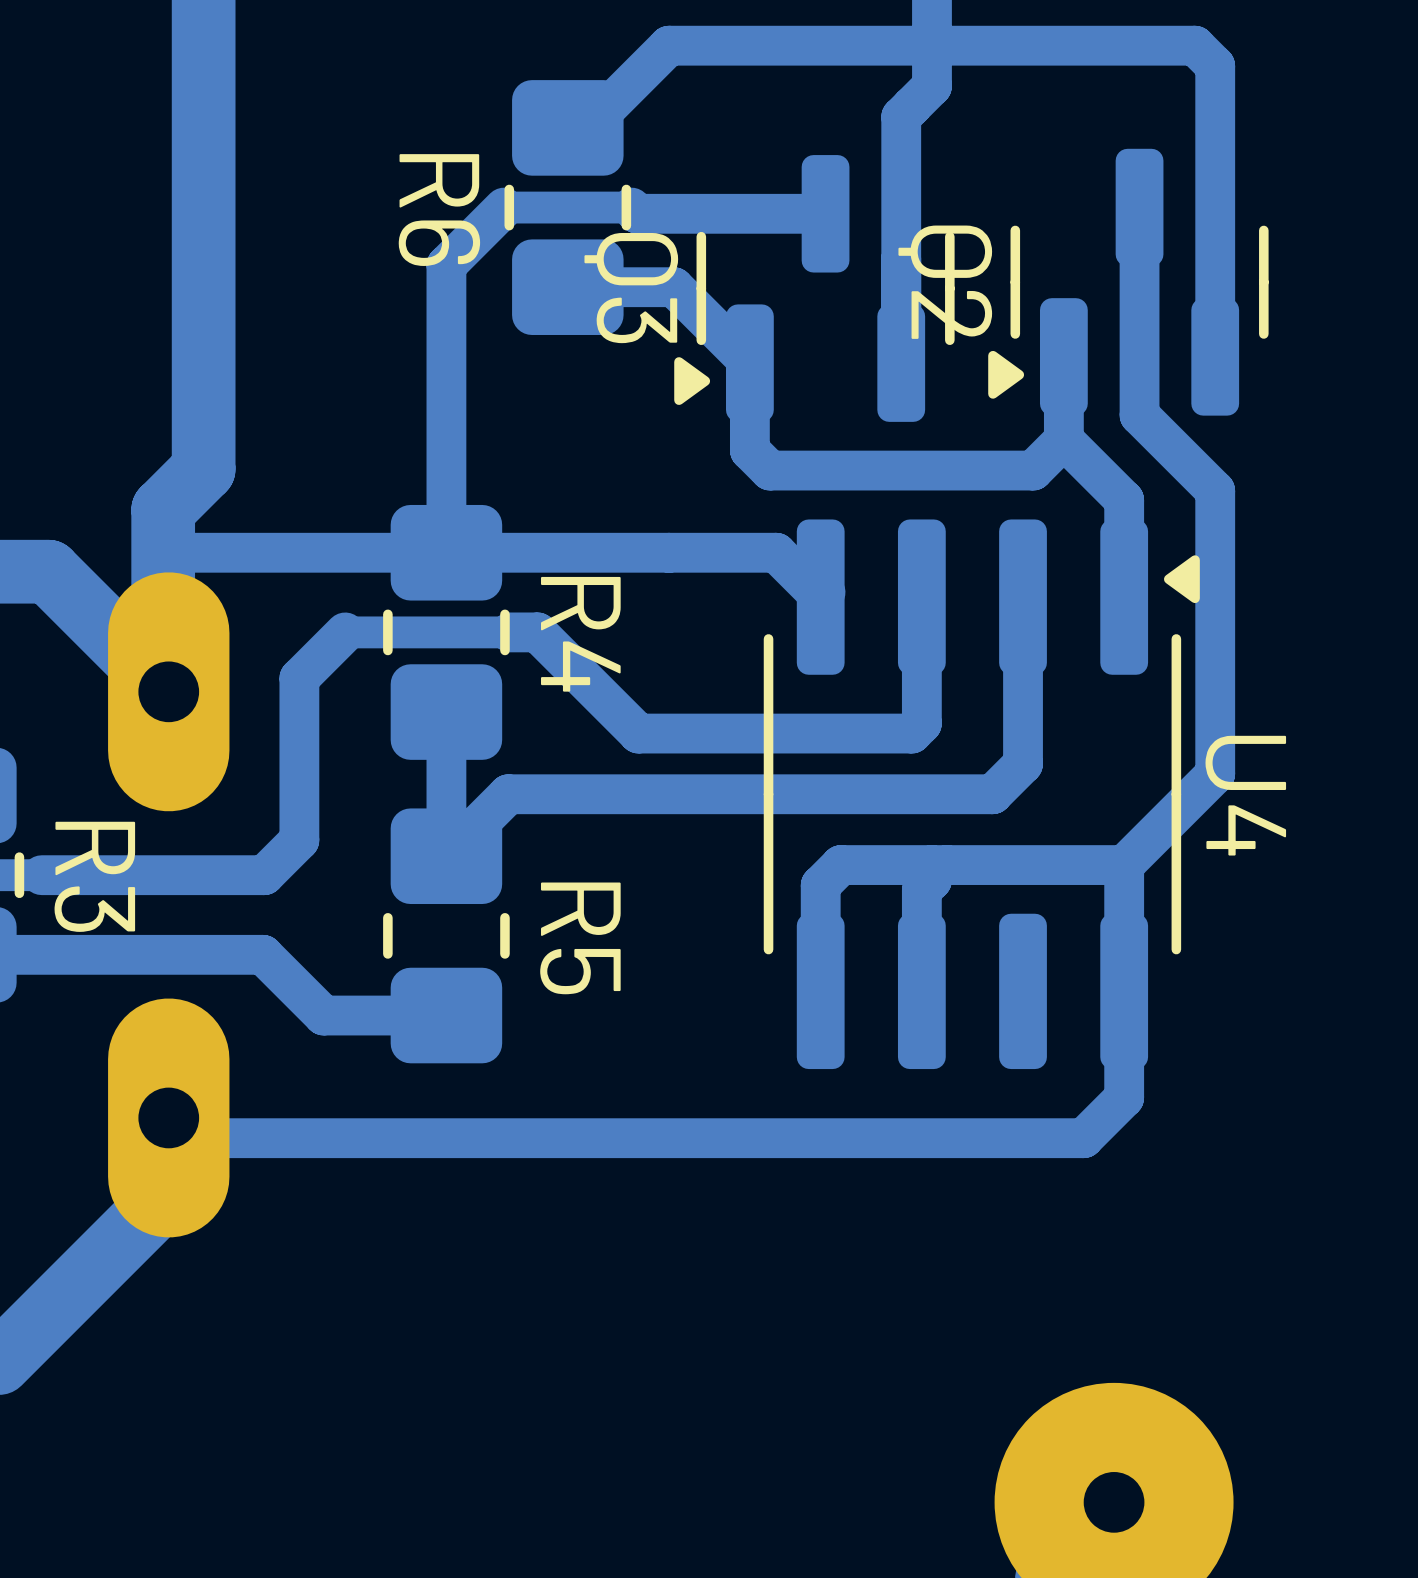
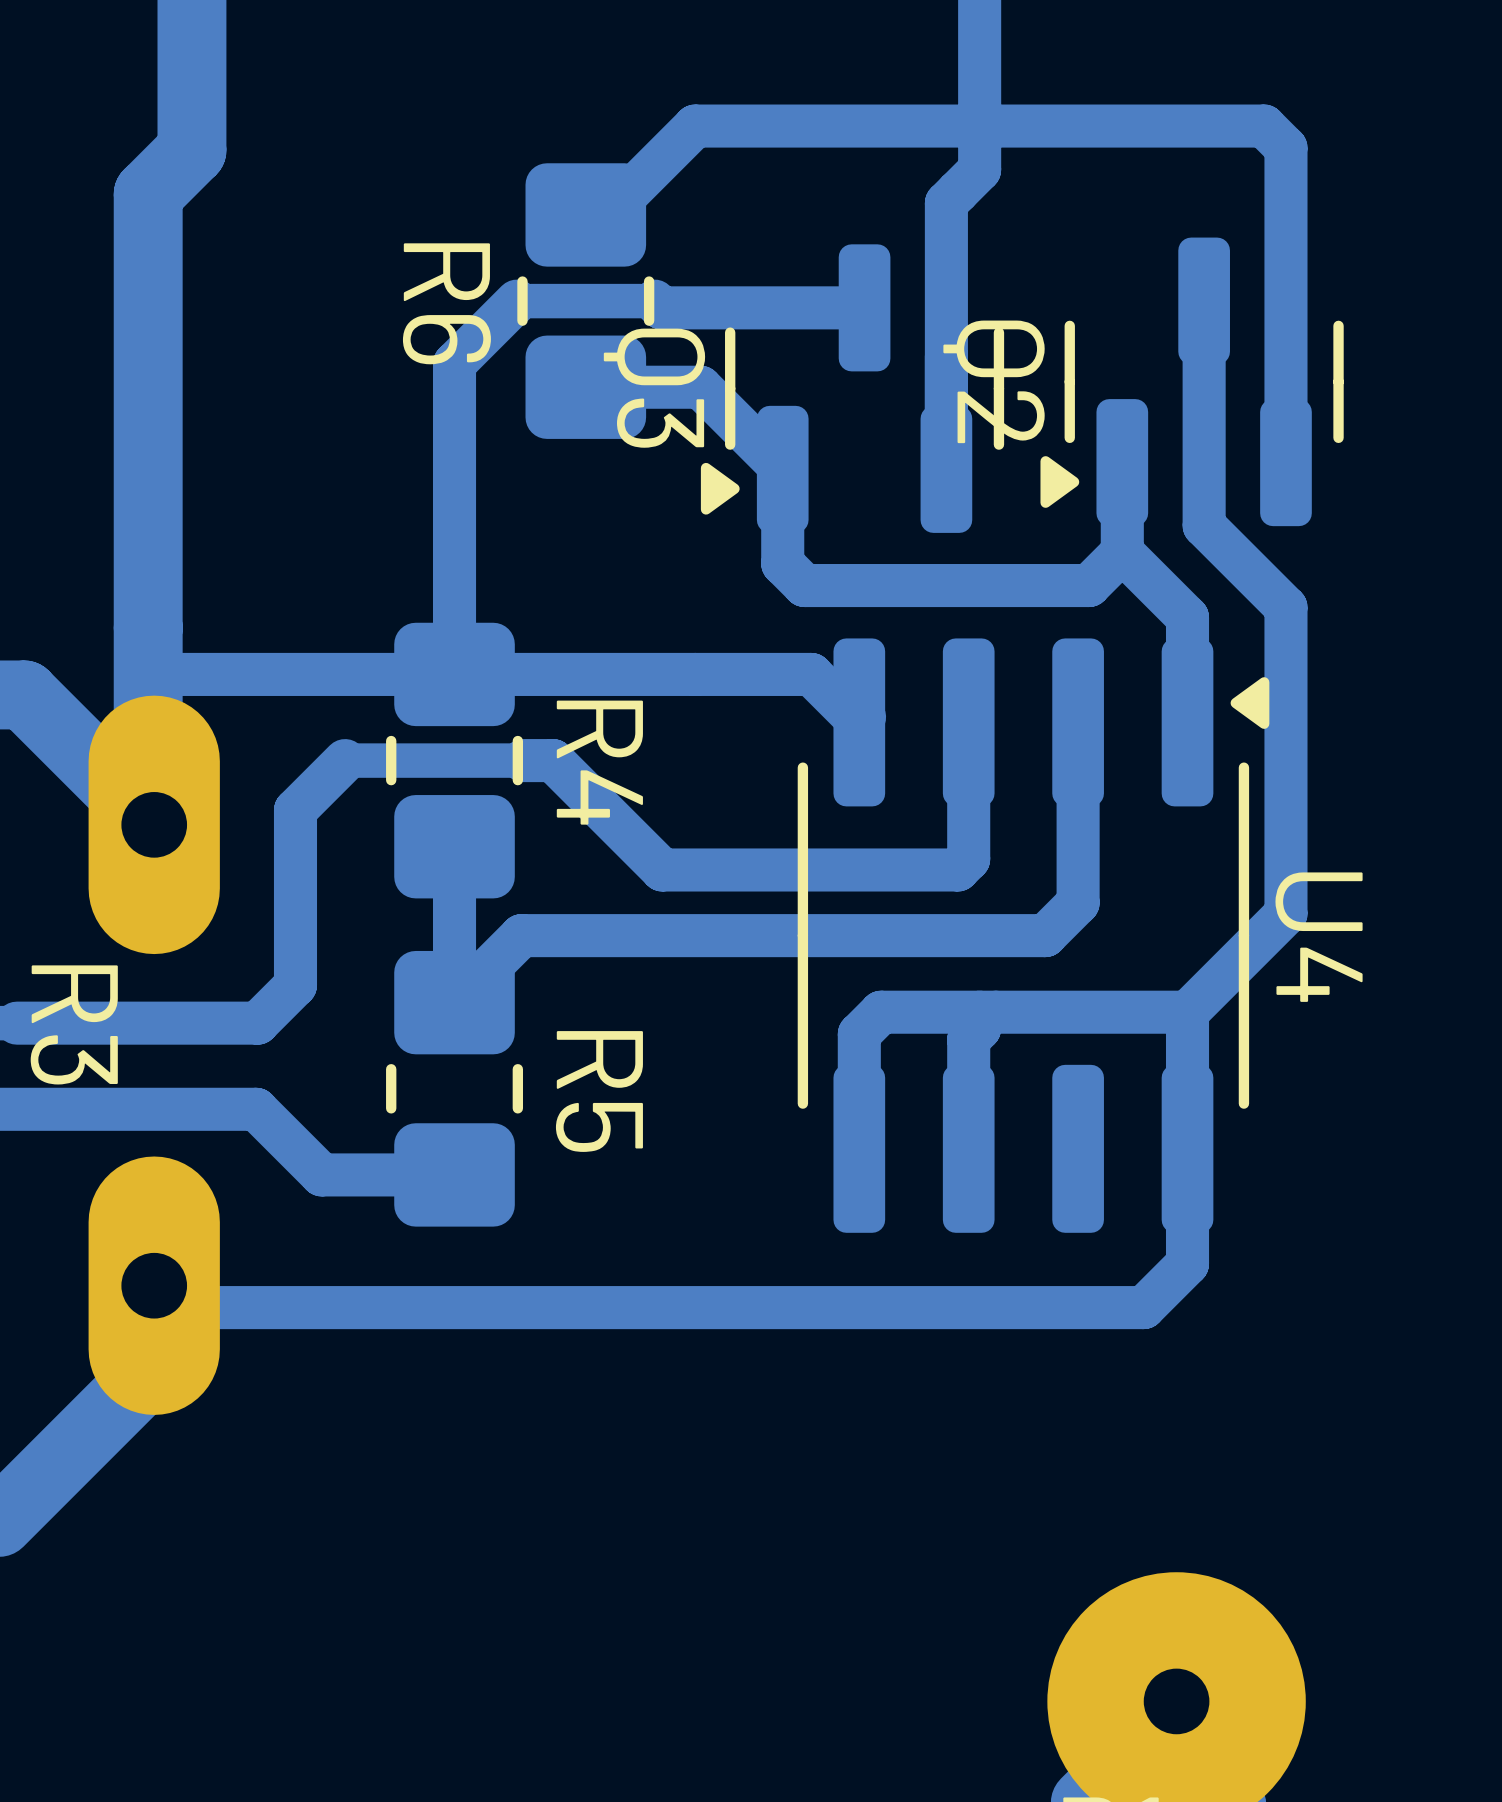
track: (203, 68) (203, 469) (163, 509) -> (191, 150) (148, 194) (148, 627) (148, 509)

